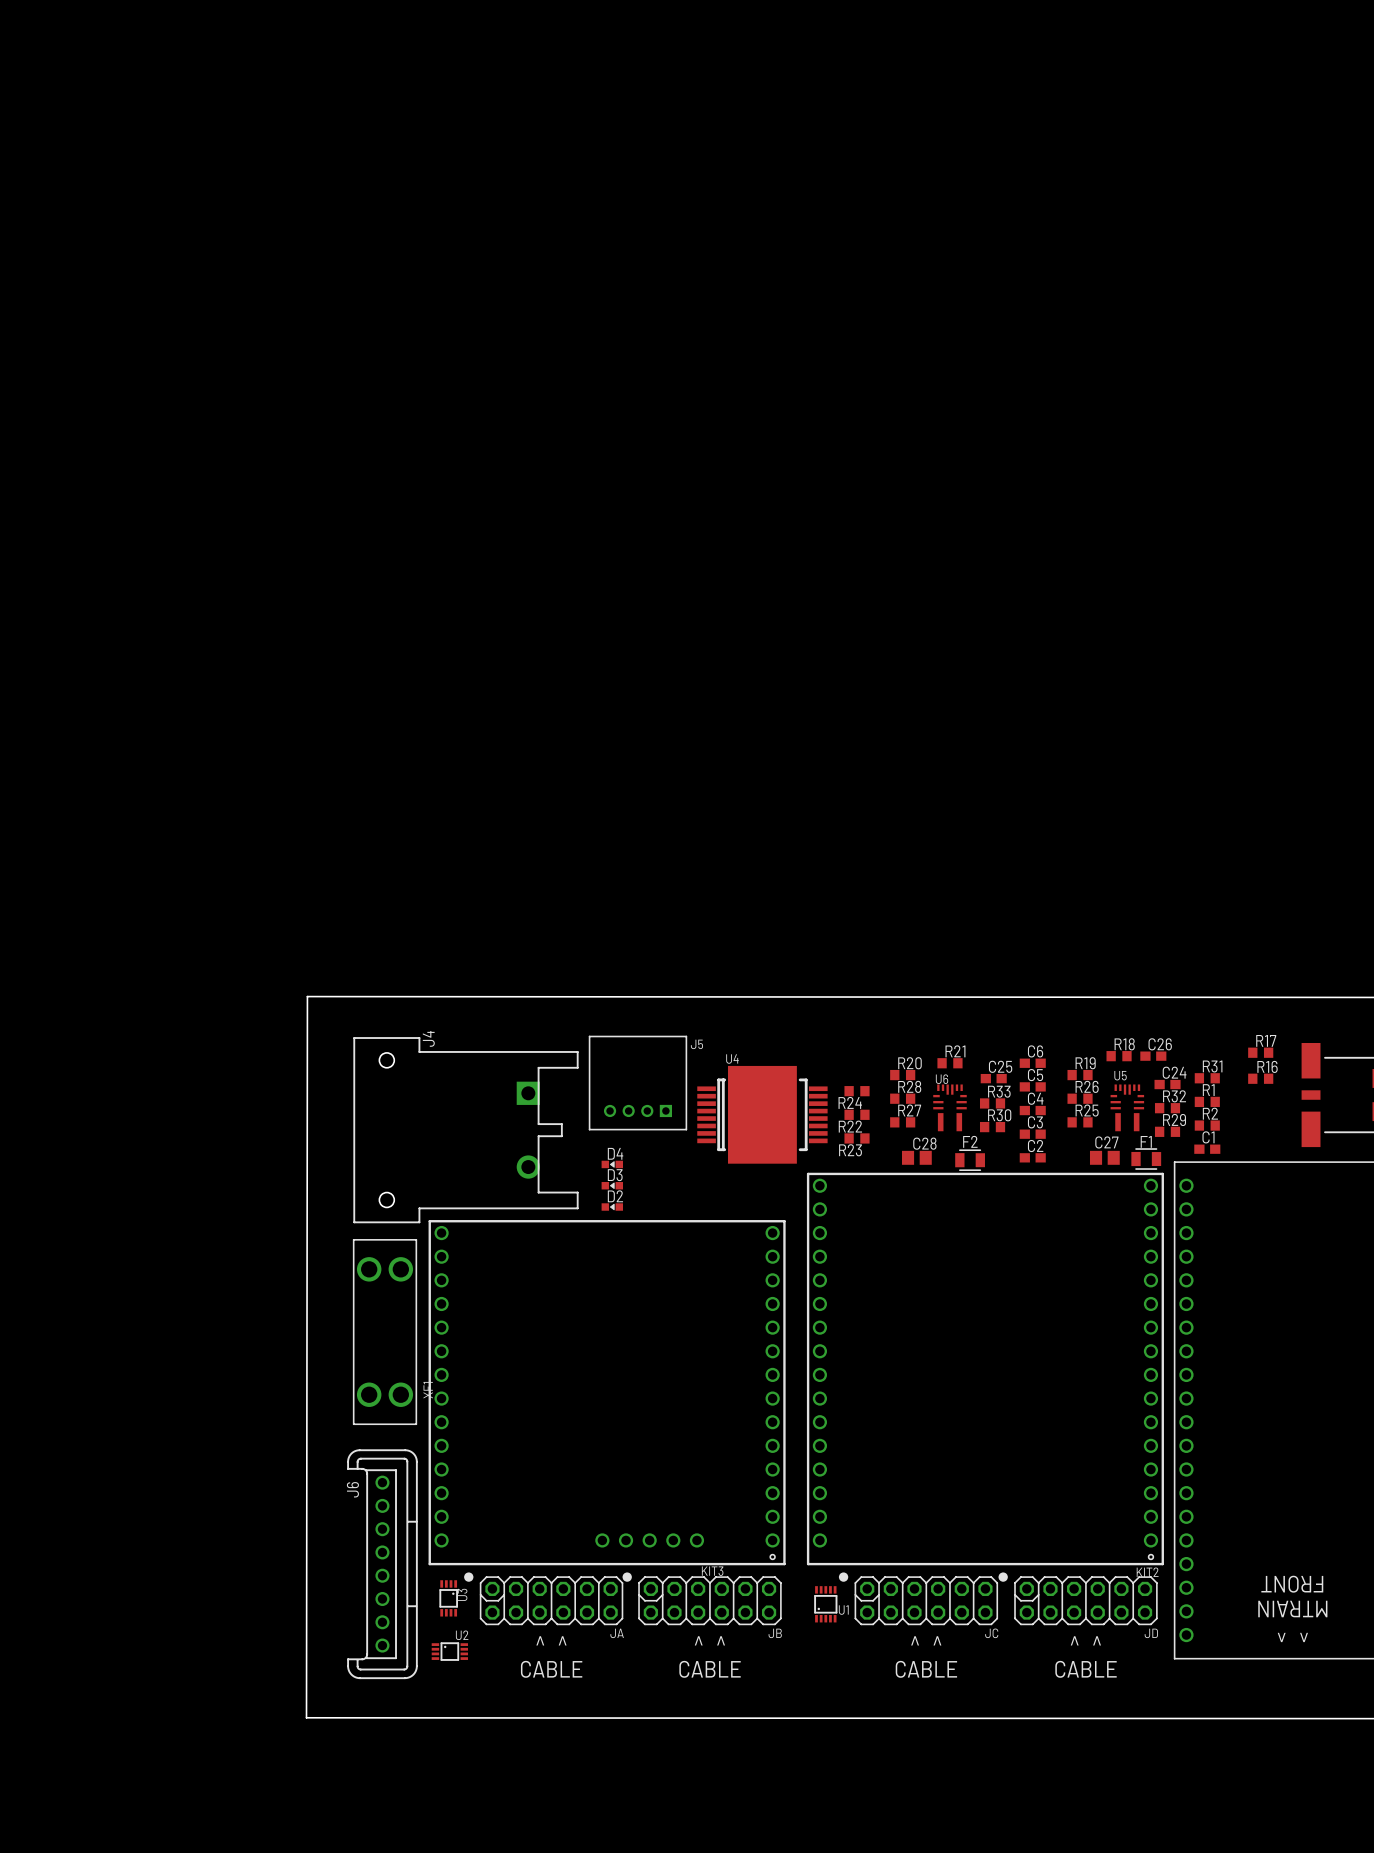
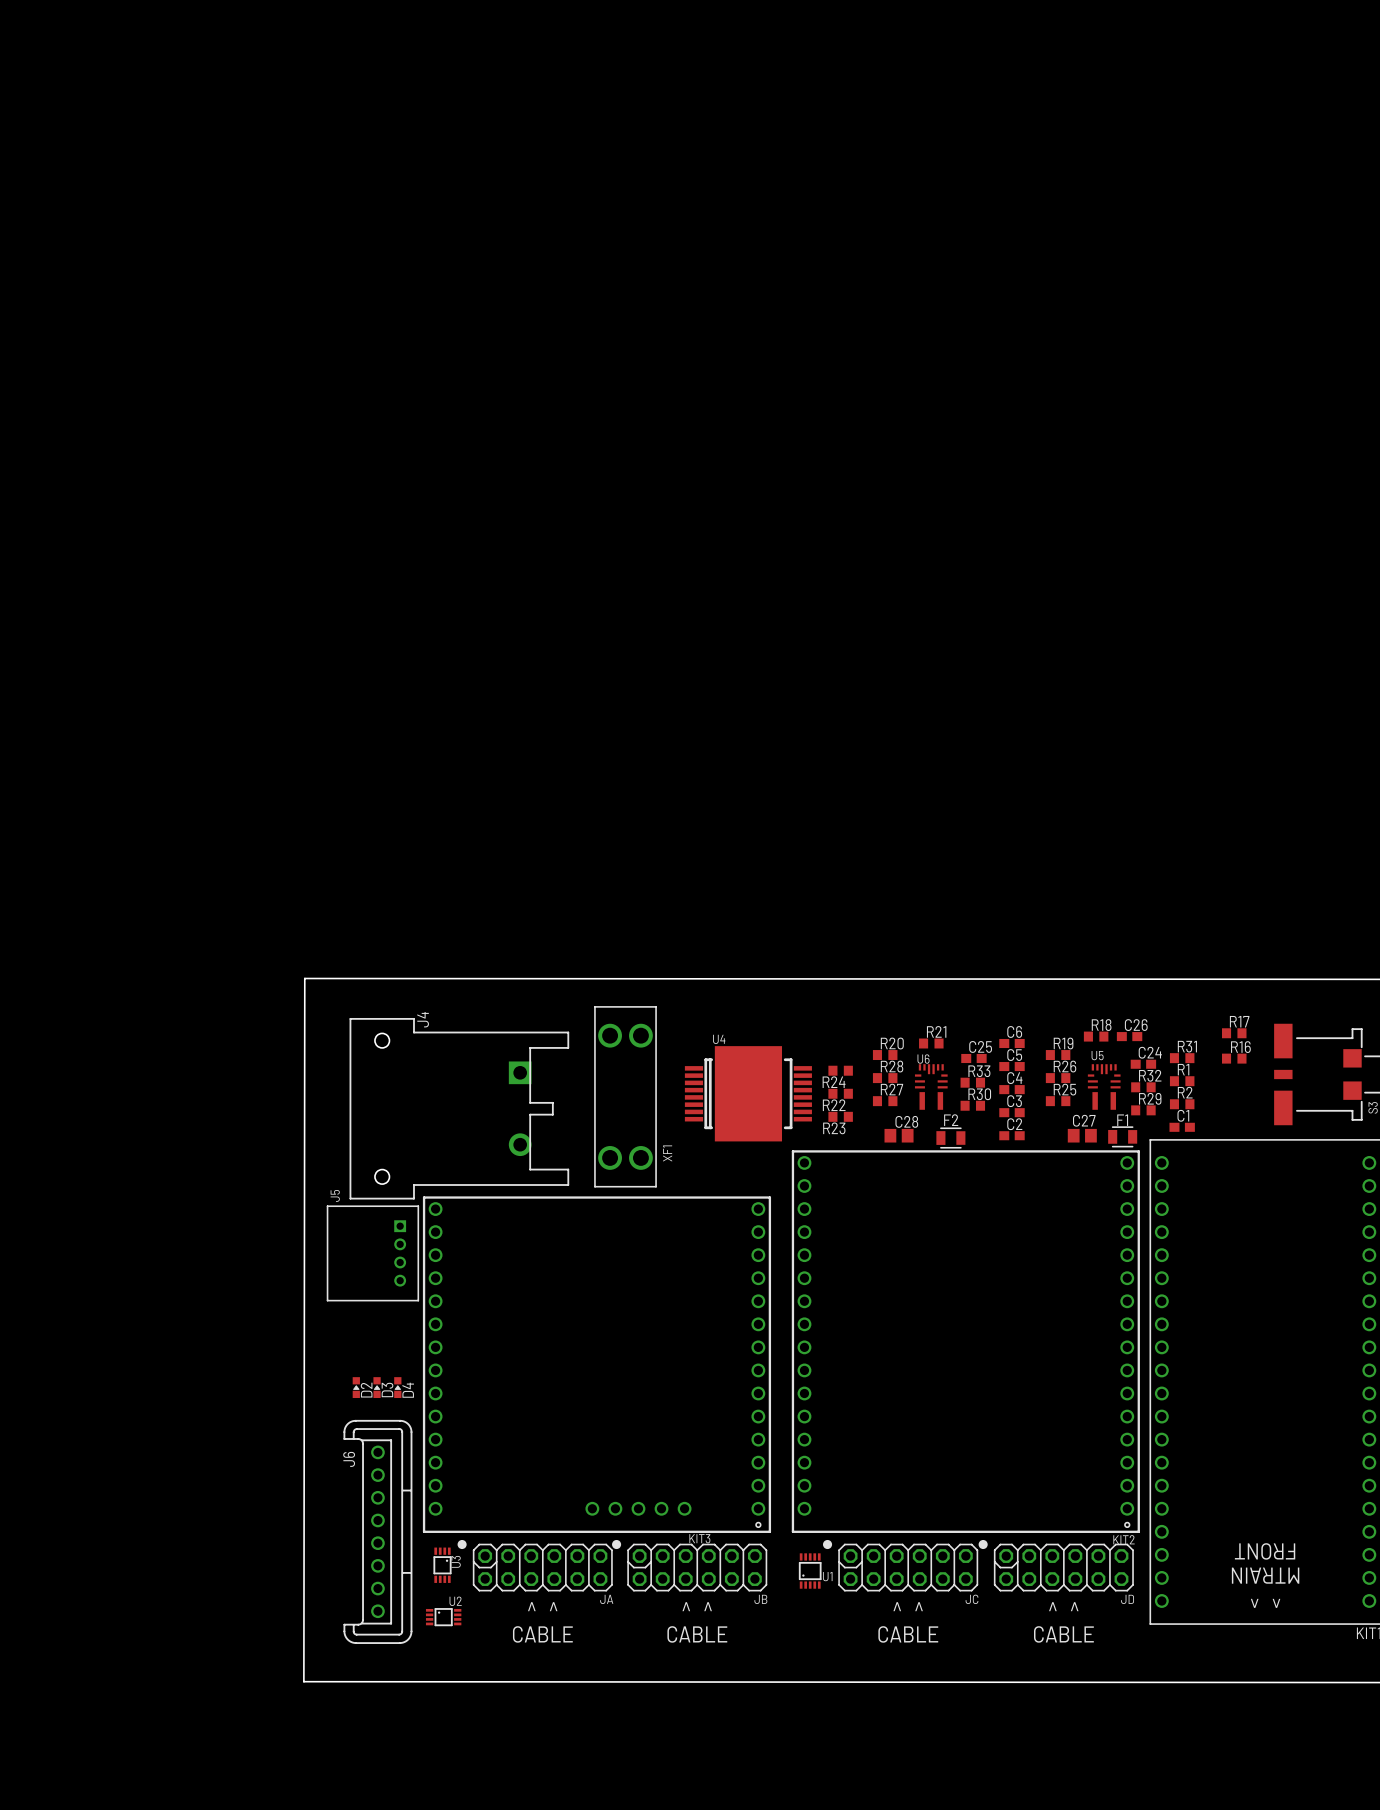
J5 rotation: 0° (637, 1083) -> 90° counterclockwise (372, 1253)
J5 position: (637, 1083) -> (372, 1253)
D4 rotation: 0° (612, 1164) -> 90° clockwise (397, 1387)
D4 position: (612, 1164) -> (397, 1387)
D3 rotation: 0° (612, 1185) -> 90° clockwise (377, 1387)
D3 position: (612, 1185) -> (377, 1387)
D2 rotation: 0° (612, 1207) -> 90° clockwise (356, 1387)
D2 position: (612, 1207) -> (356, 1387)
XF1 position: (385, 1332) -> (625, 1096)

